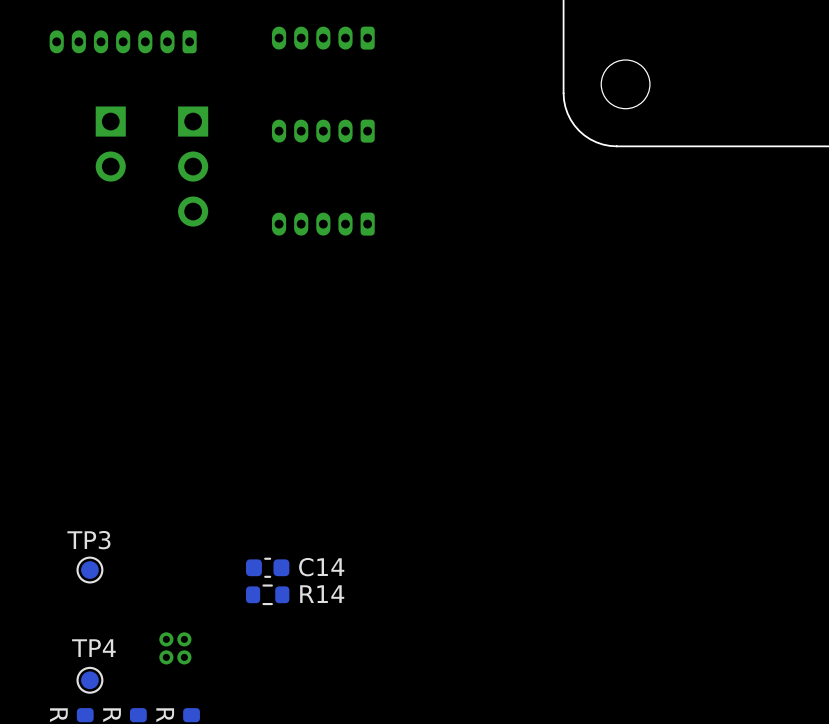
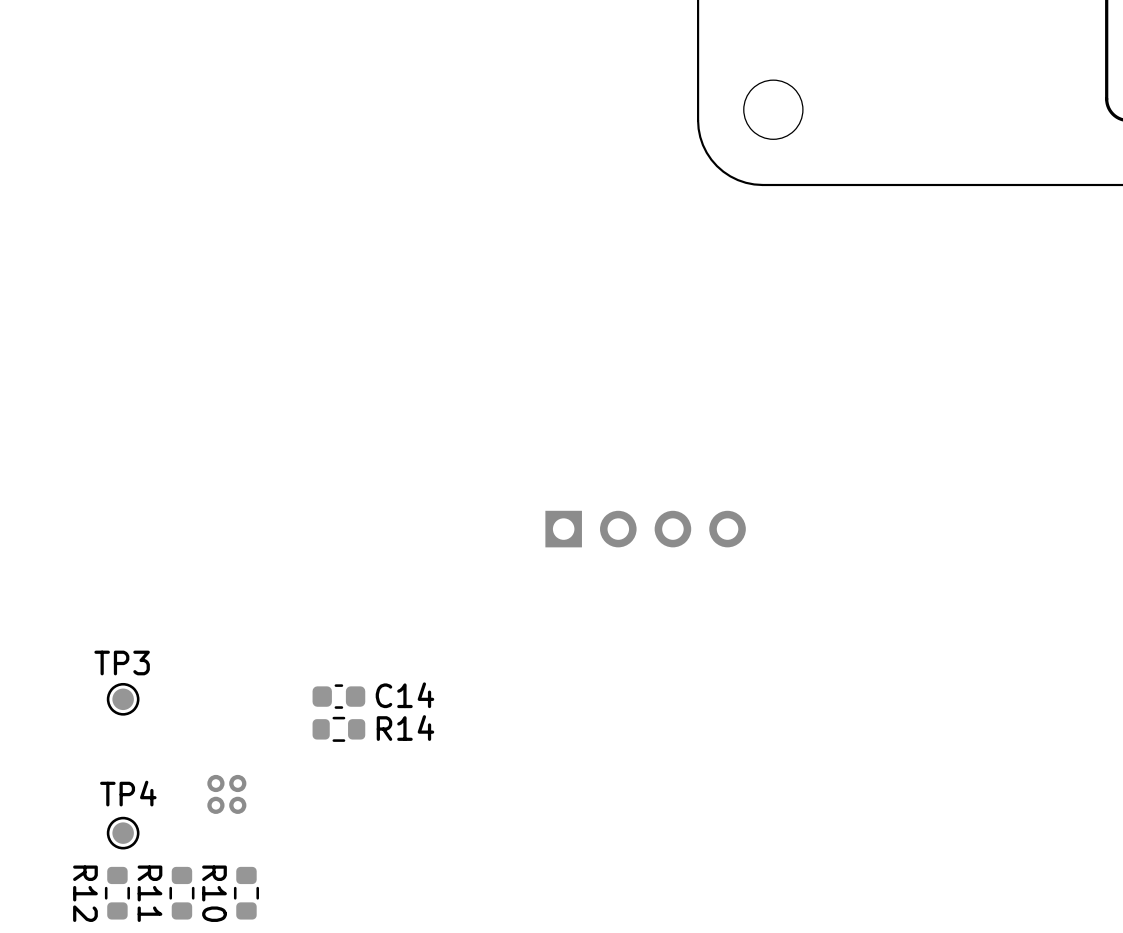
part: (323, 38) -> none
part: (123, 41) -> none
part: (323, 131) -> none
part: (110, 144) -> none
part: (193, 166) -> none
part: (323, 224) -> none
part: none -> (645, 529)

